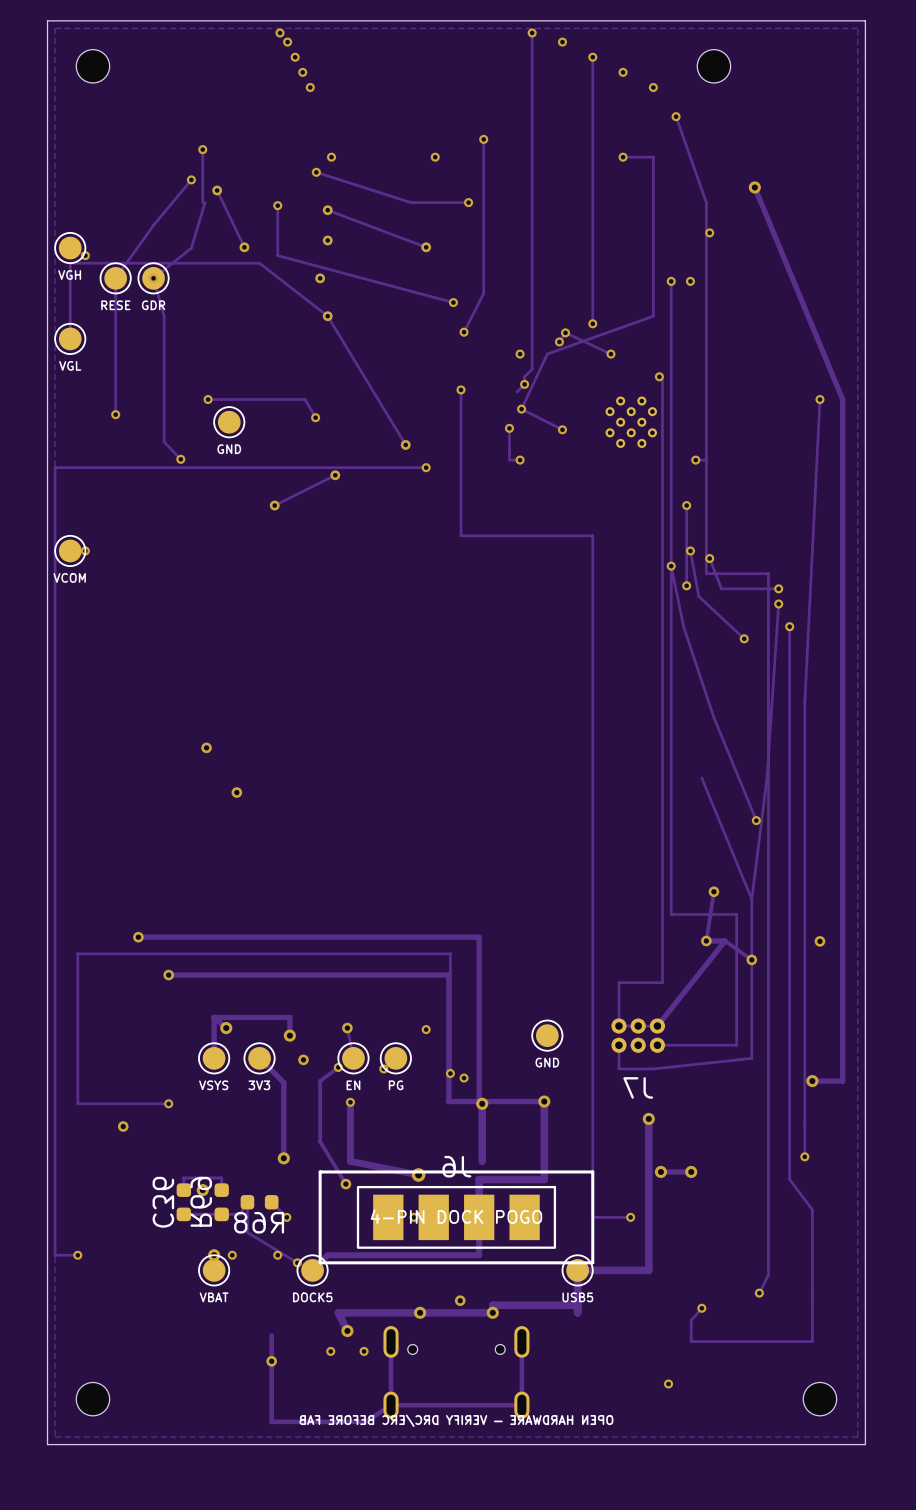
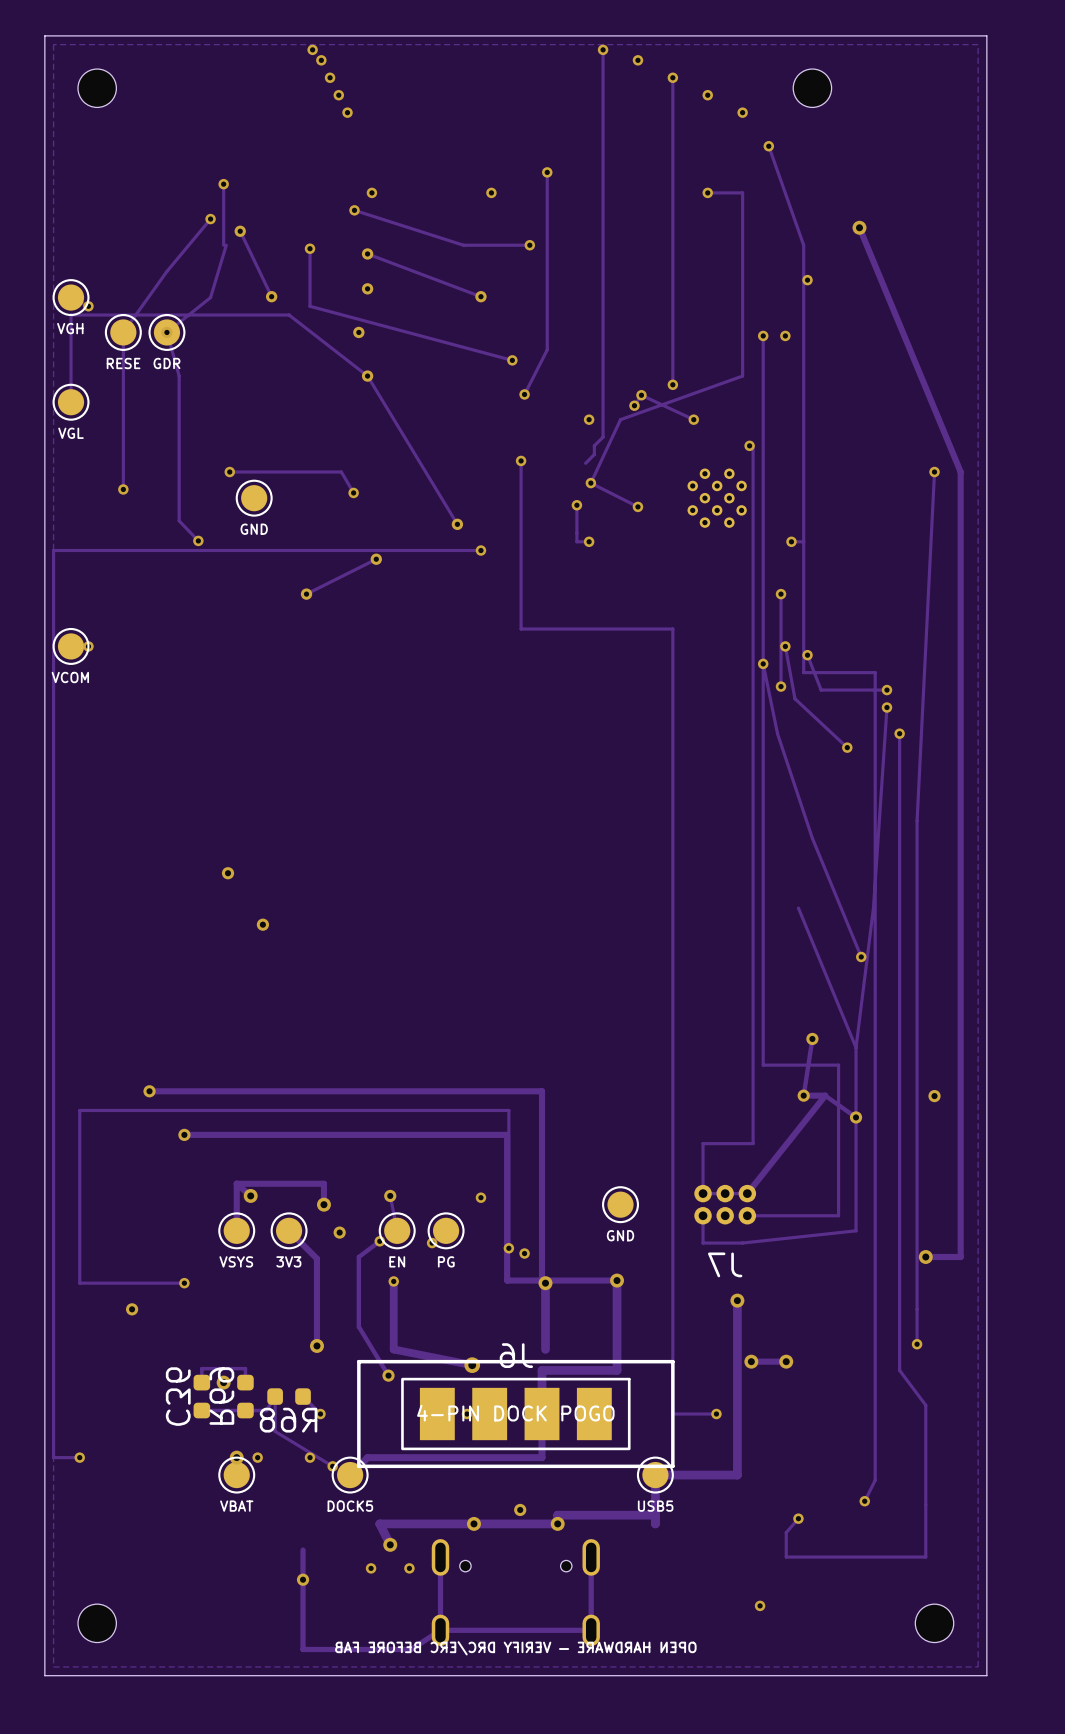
via: (524, 384) -> none

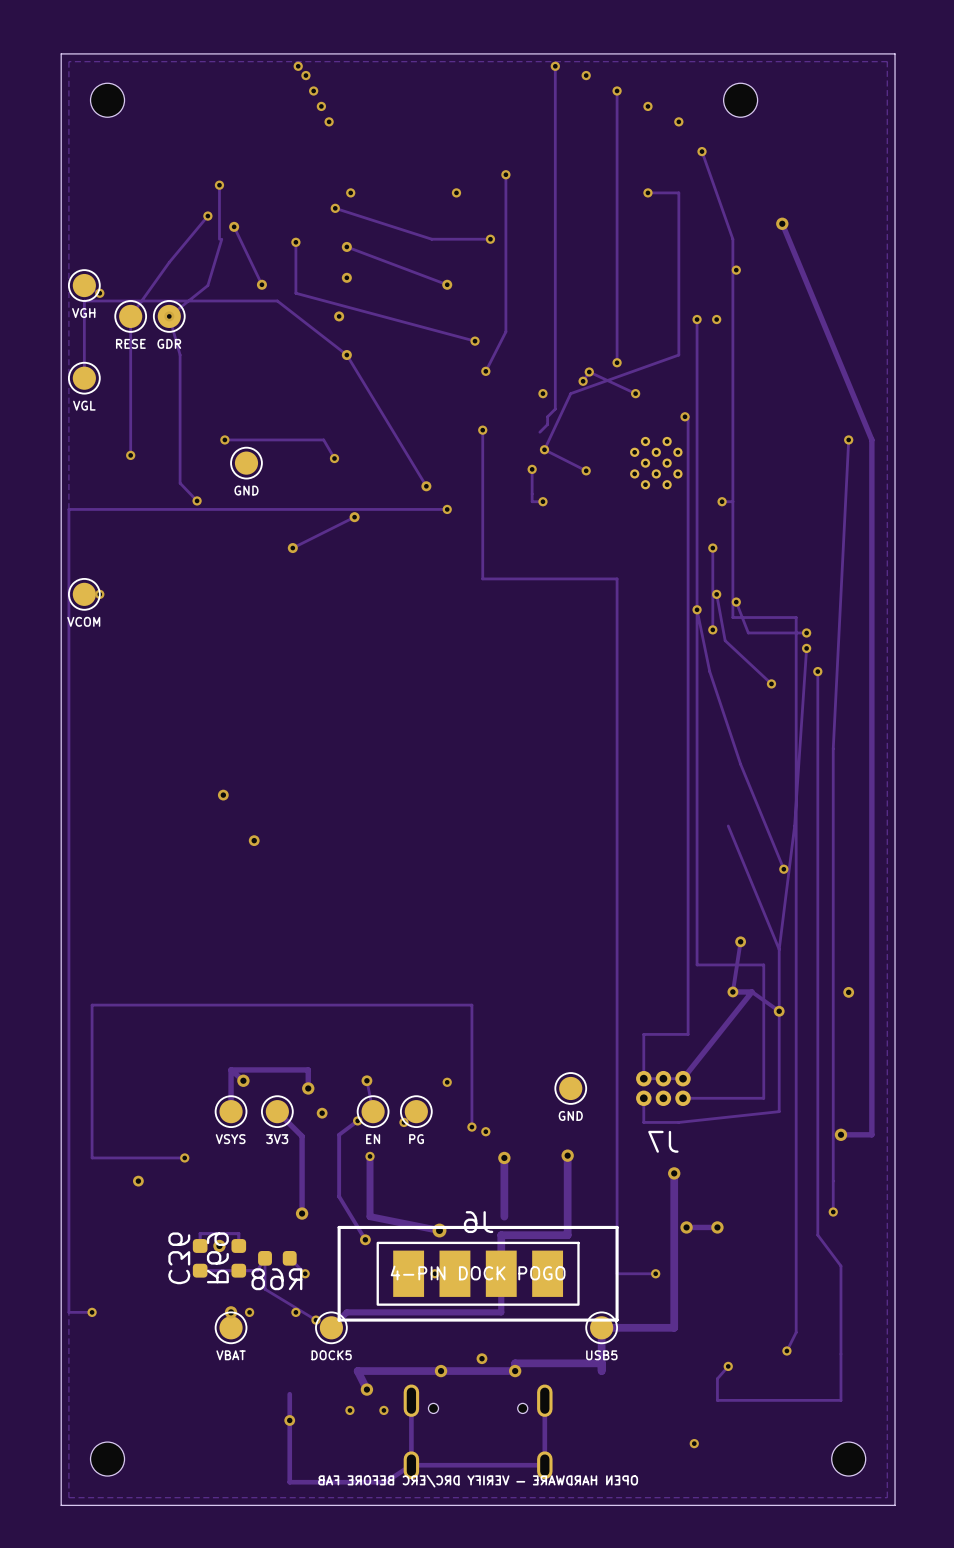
track: (149, 1091) (542, 1091) (542, 1283) (545, 1283) -> none
via: (149, 1091) -> none
track: (184, 1134) (507, 1134) (507, 1280) (617, 1280) -> none
via: (184, 1134) -> none

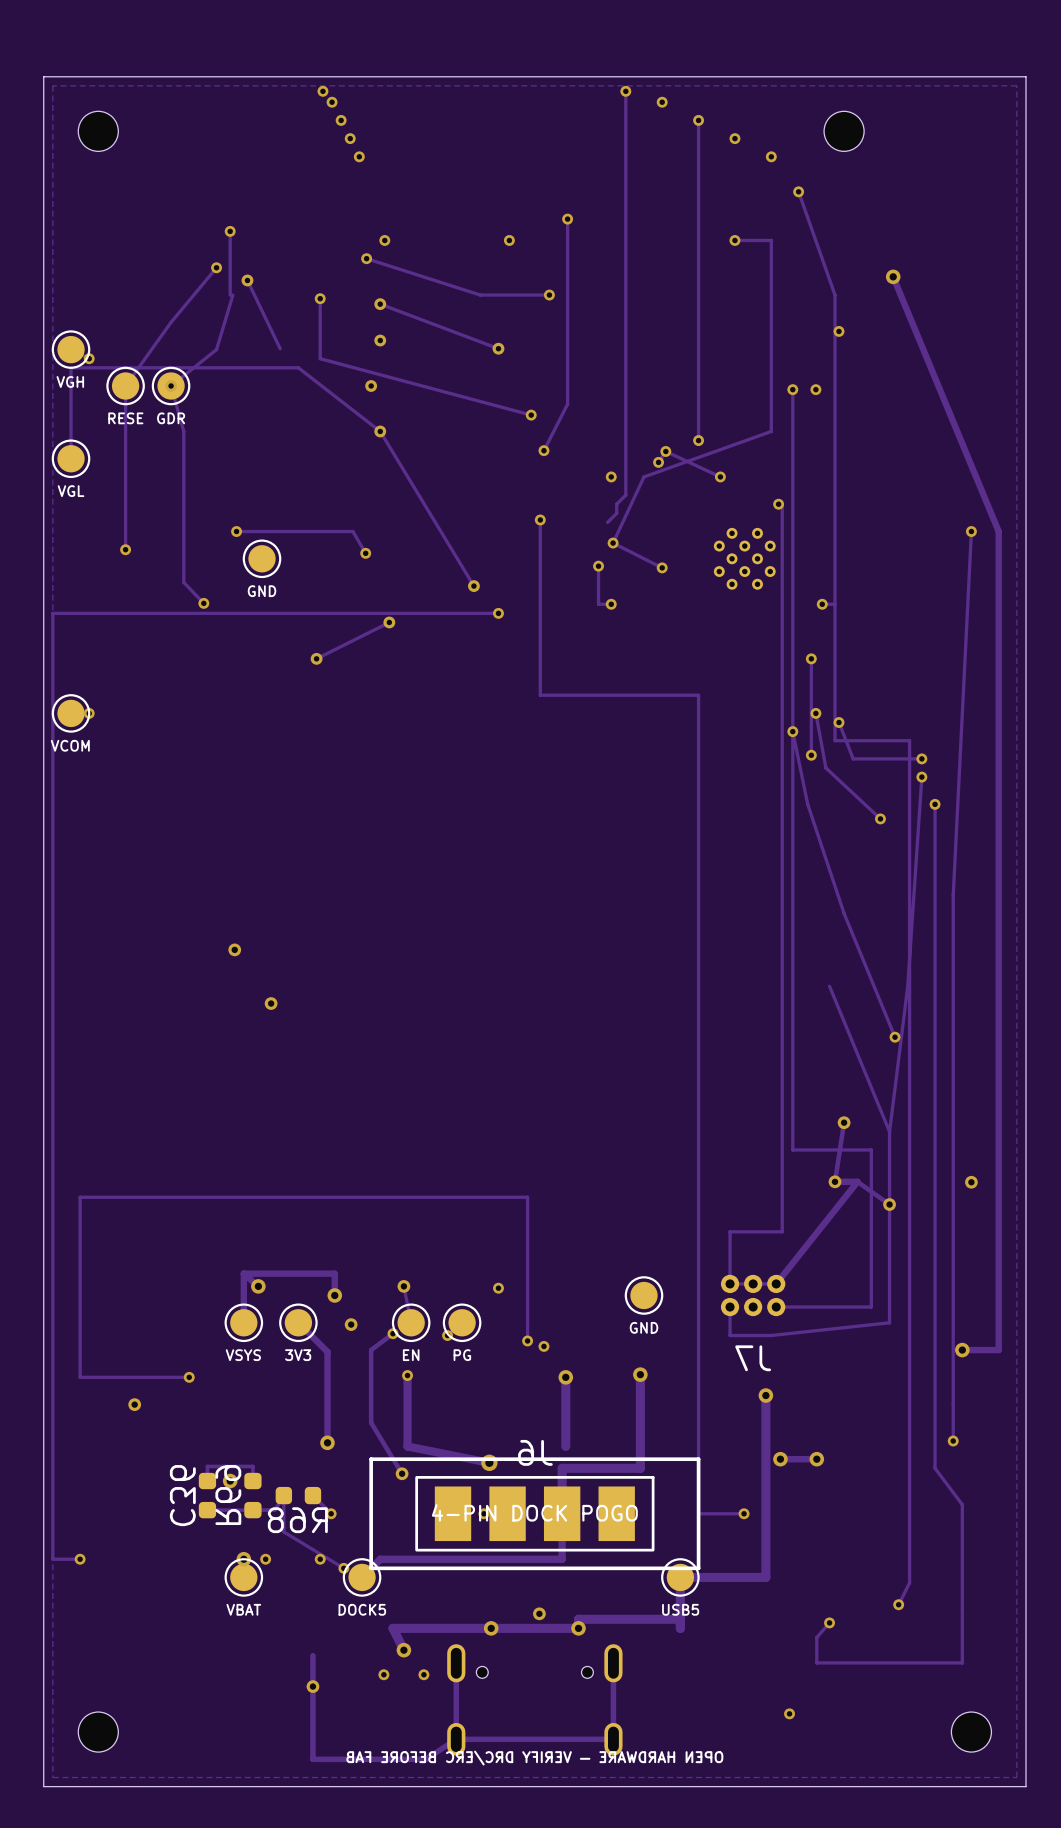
via: (261, 284) -> none

